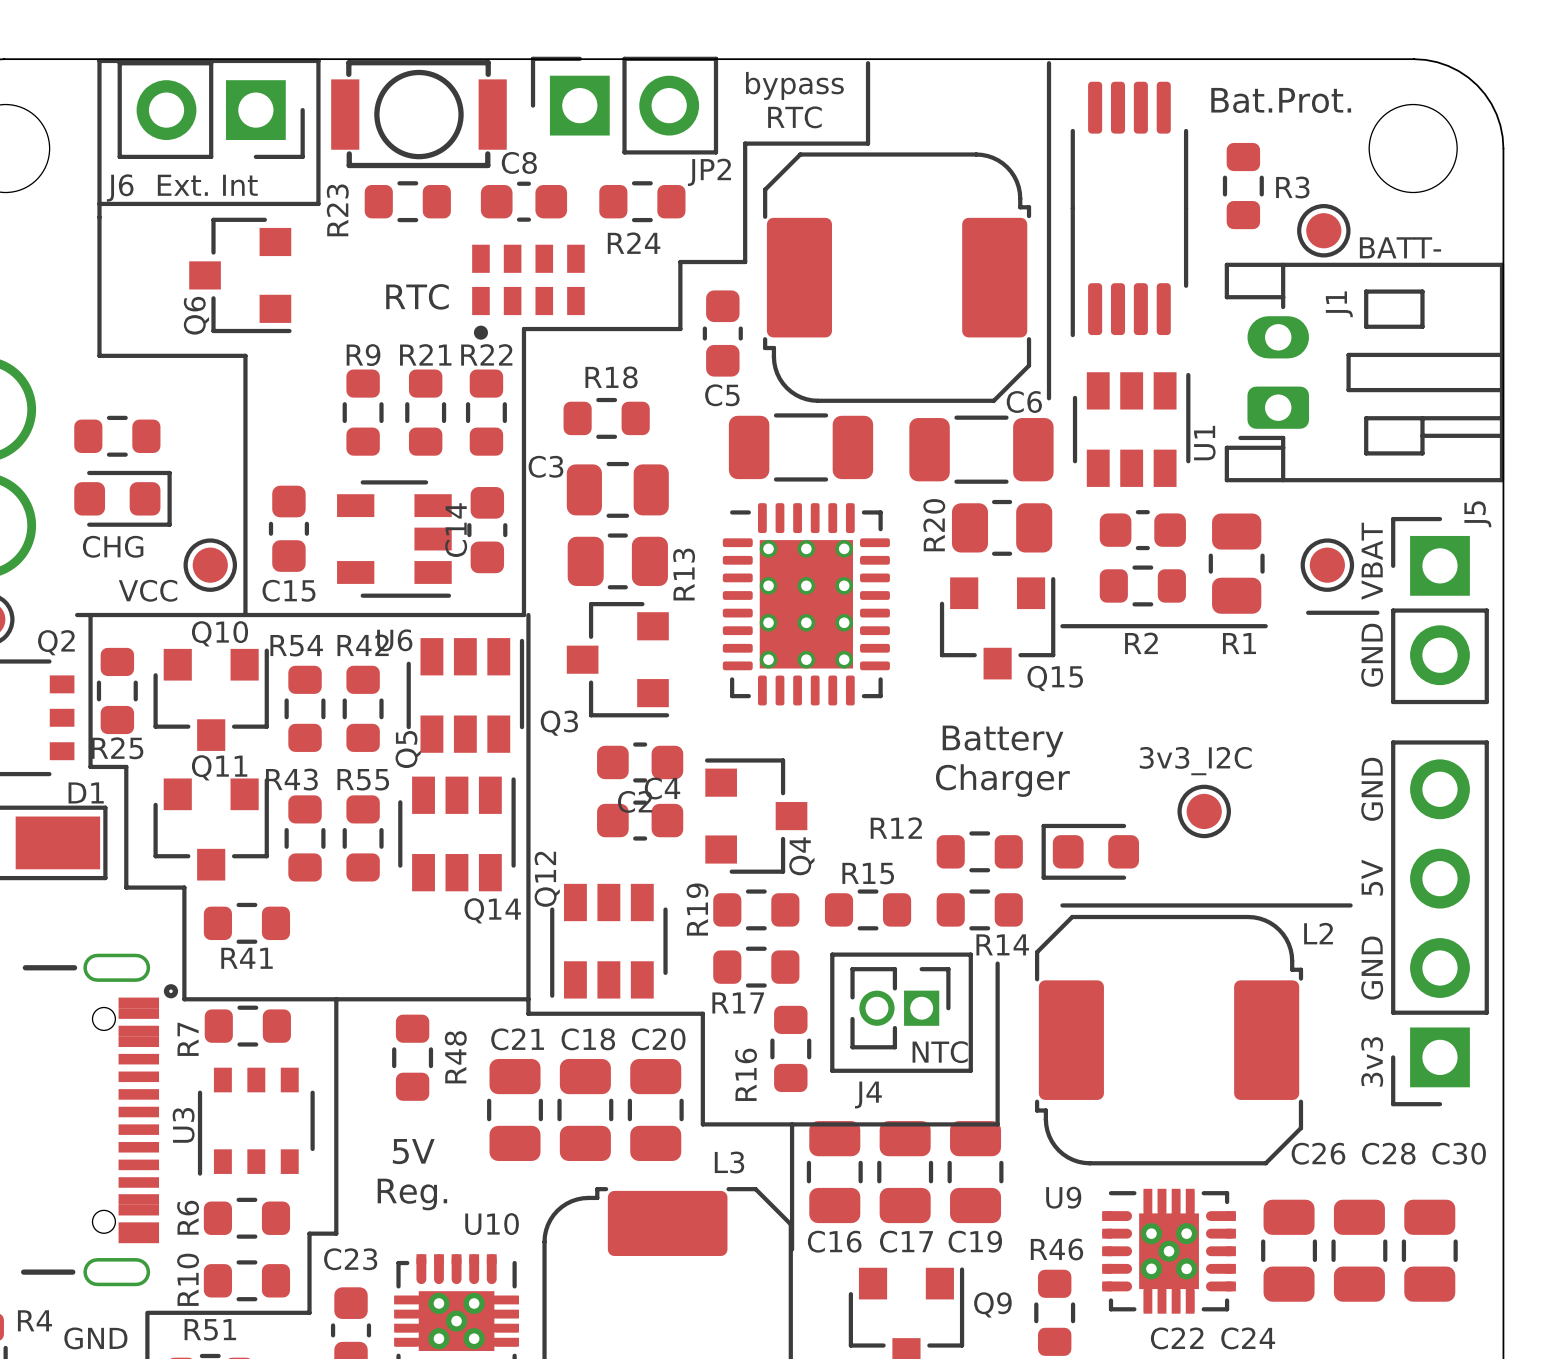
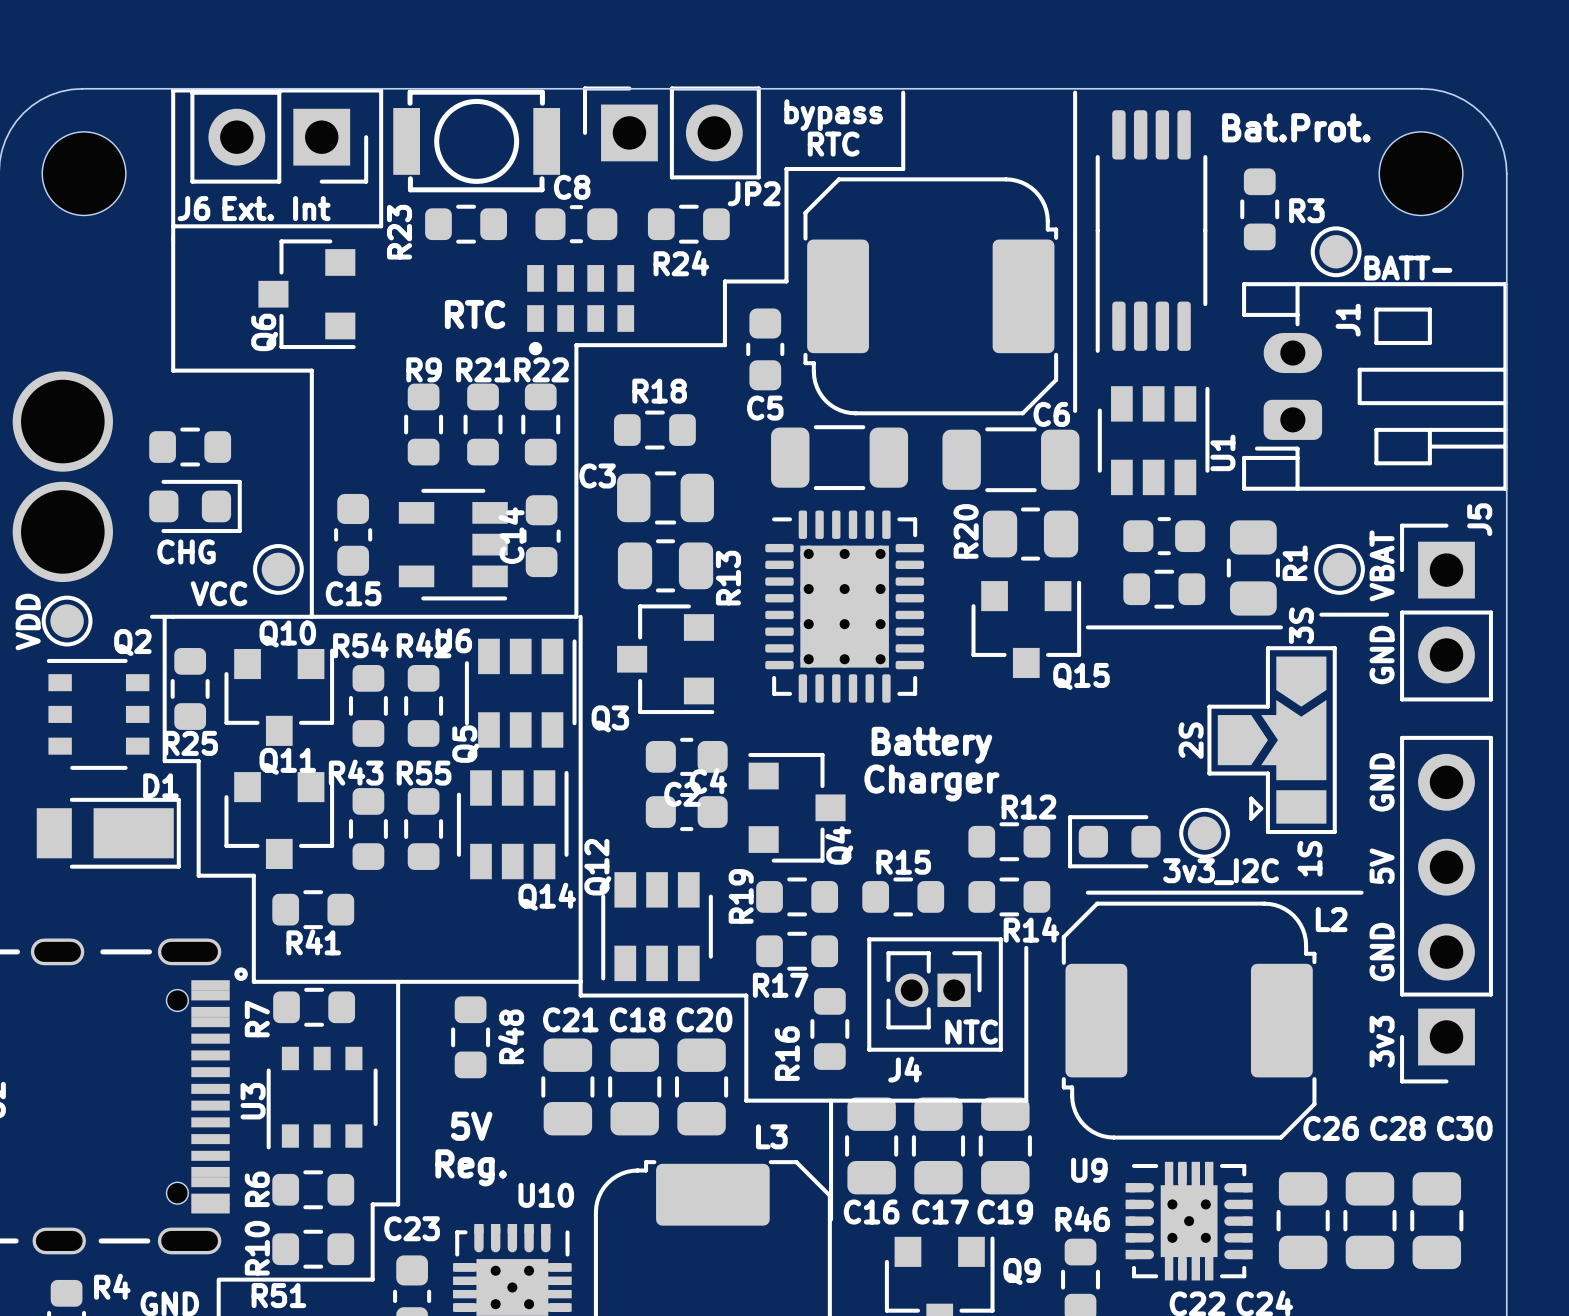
R2 name: R2 (1141, 643) -> none
R1 name rotation: 0° (1239, 643) -> 90° counterclockwise (1295, 563)
R1 name position: R1 (1239, 643) -> R1 (1295, 563)
text position: Battery (1003, 741) -> Battery (931, 745)
part: none -> (1272, 740)
text position: 3v3_I2C (1195, 761) -> 3v3_I2C (1221, 871)
text position: Charger (1002, 780) -> Charger (931, 782)
part position: (1204, 811) -> (1204, 833)
R12 name position: R12 (896, 828) -> R12 (1028, 807)

